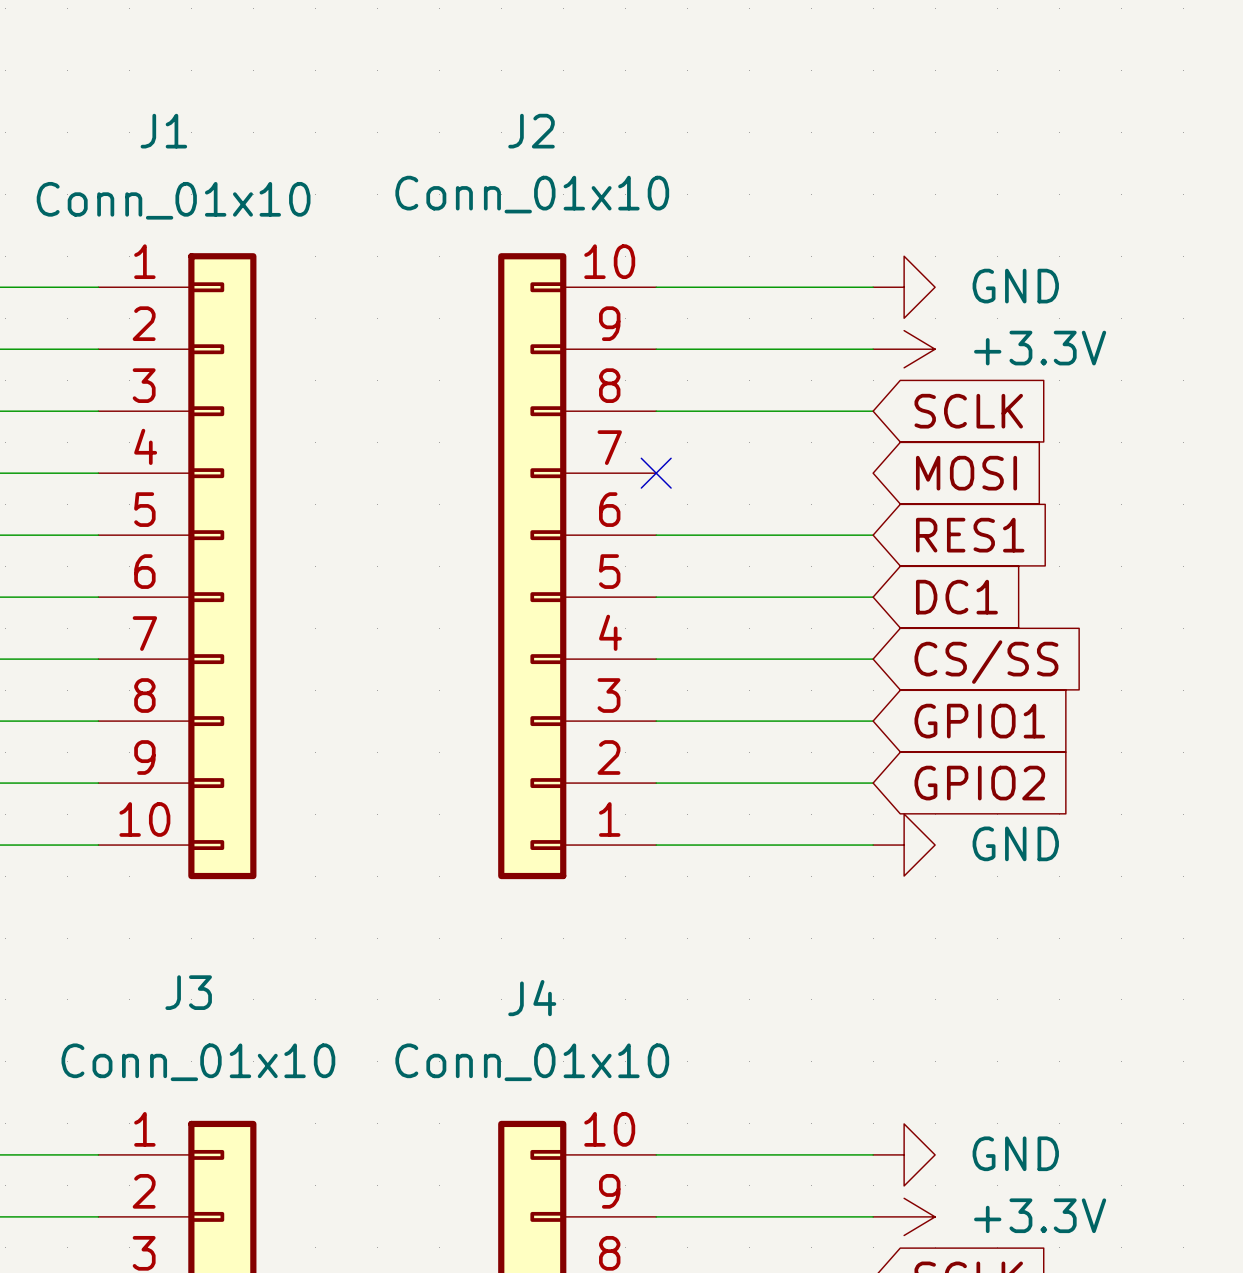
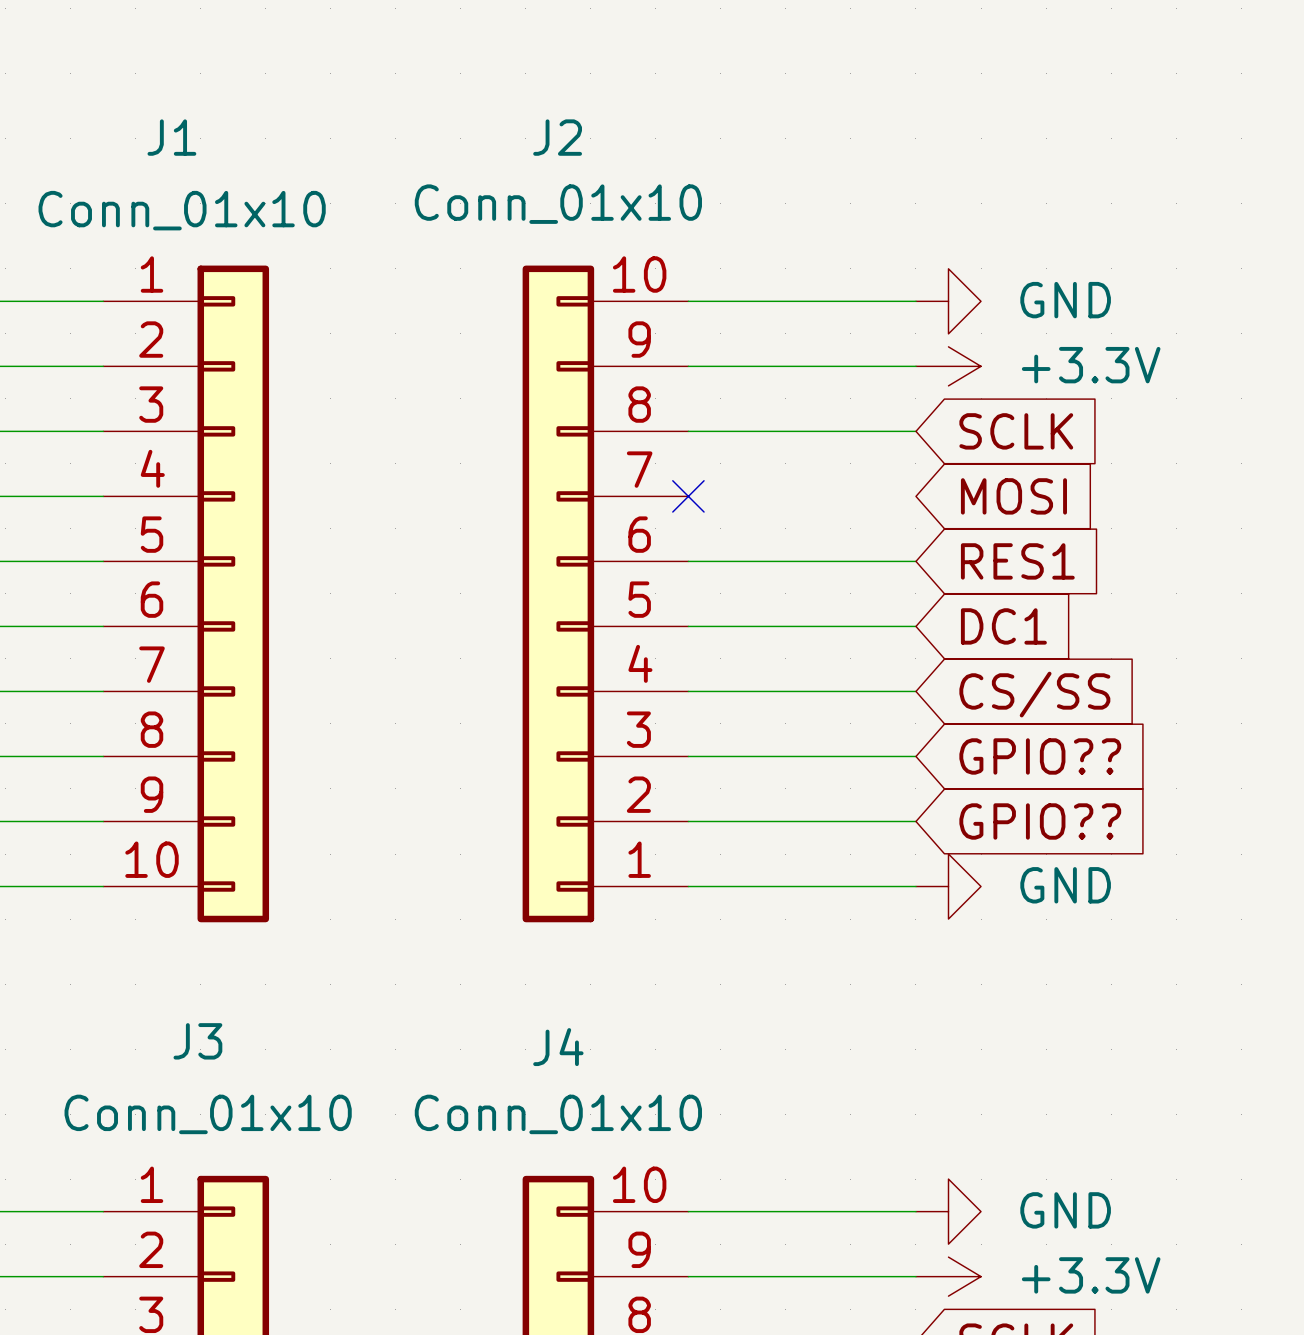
global label: GPIO1 (979, 721) -> GPIO?? (1040, 756)
global label: GPIO2 (979, 783) -> GPIO?? (1040, 821)

